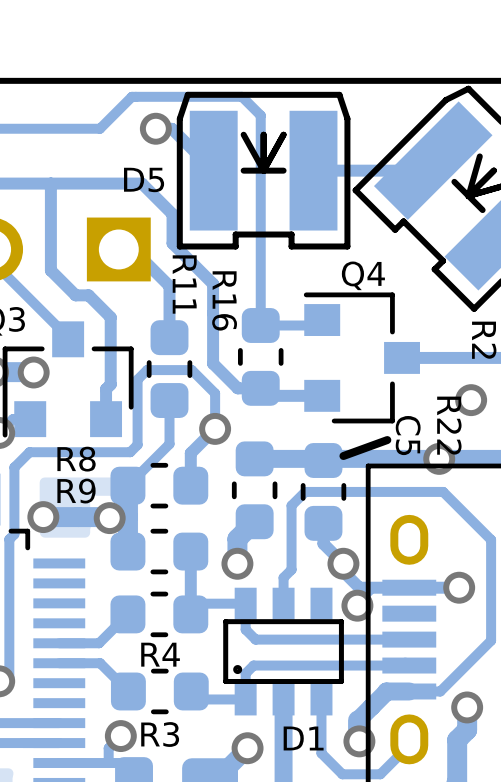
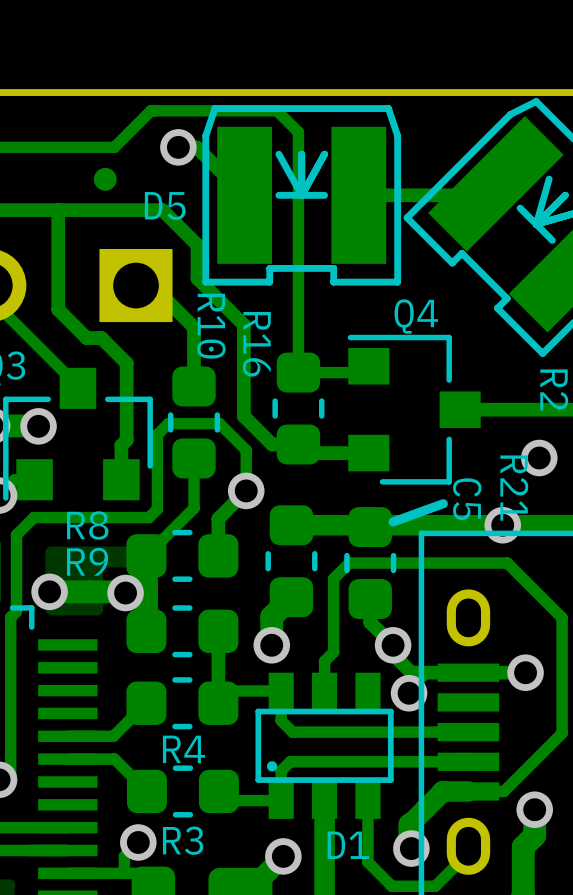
part: none -> (105, 179)
R11 name: R11 (184, 284) -> R10 (211, 326)
R22 name: R22 (449, 425) -> R21 (514, 488)

